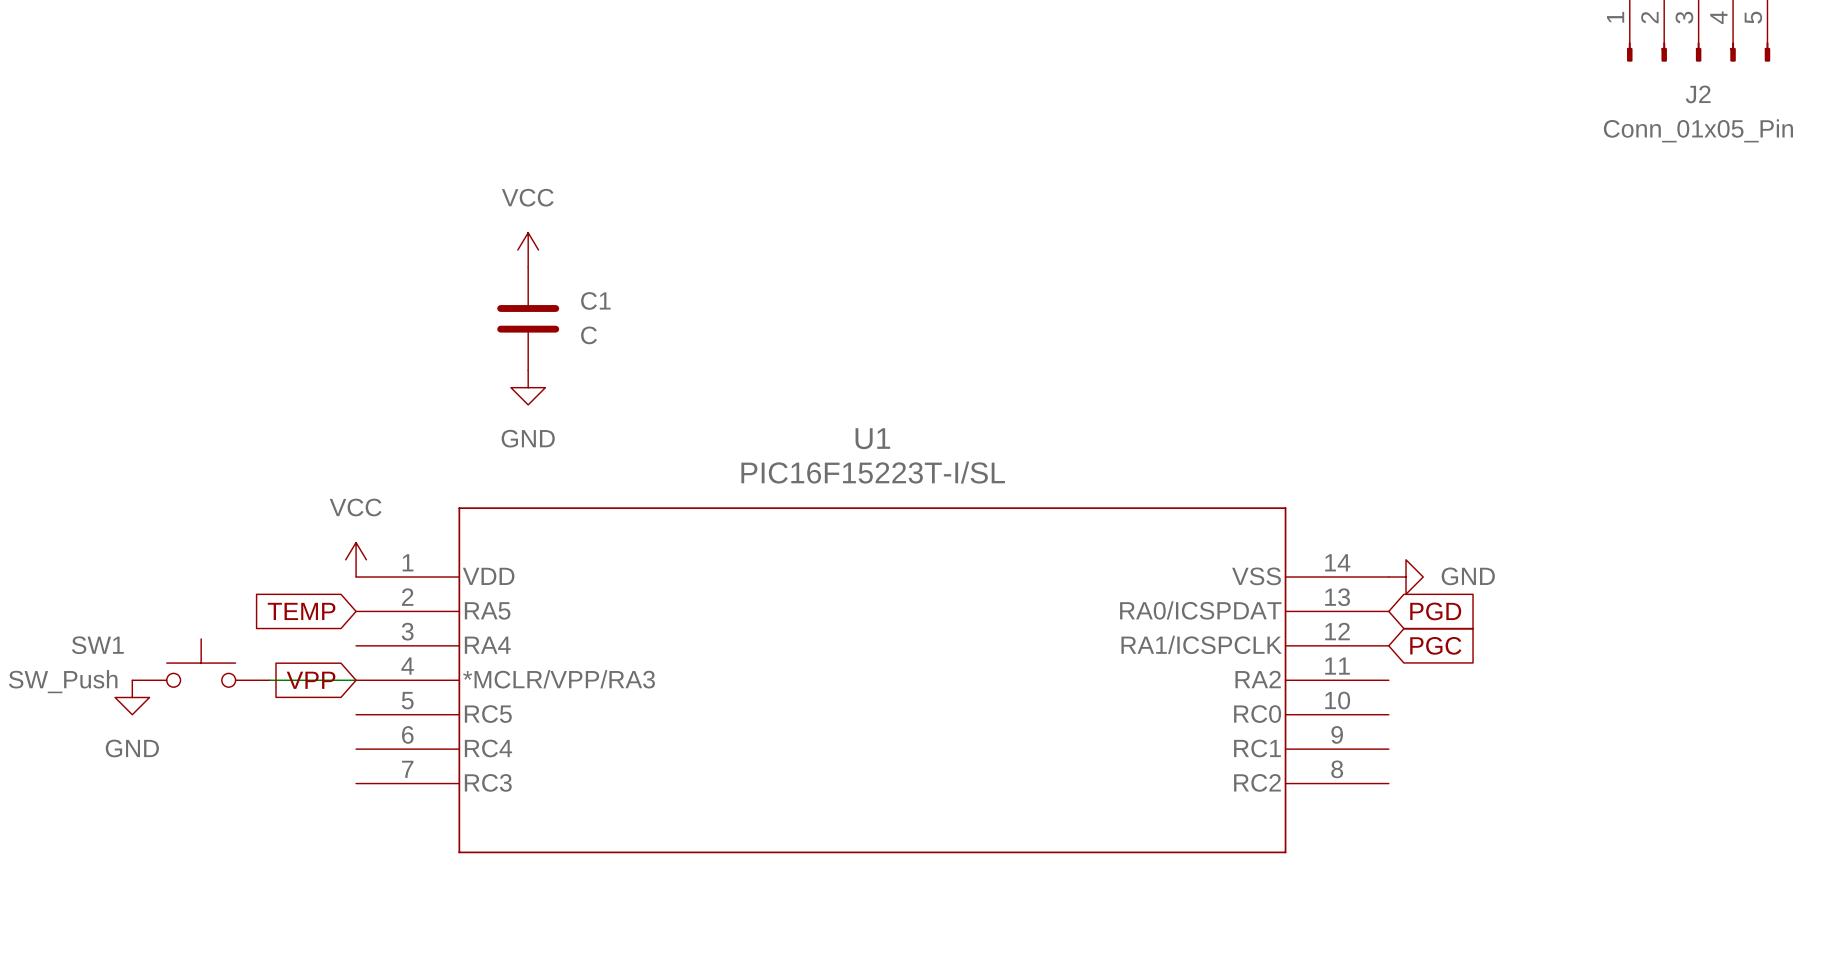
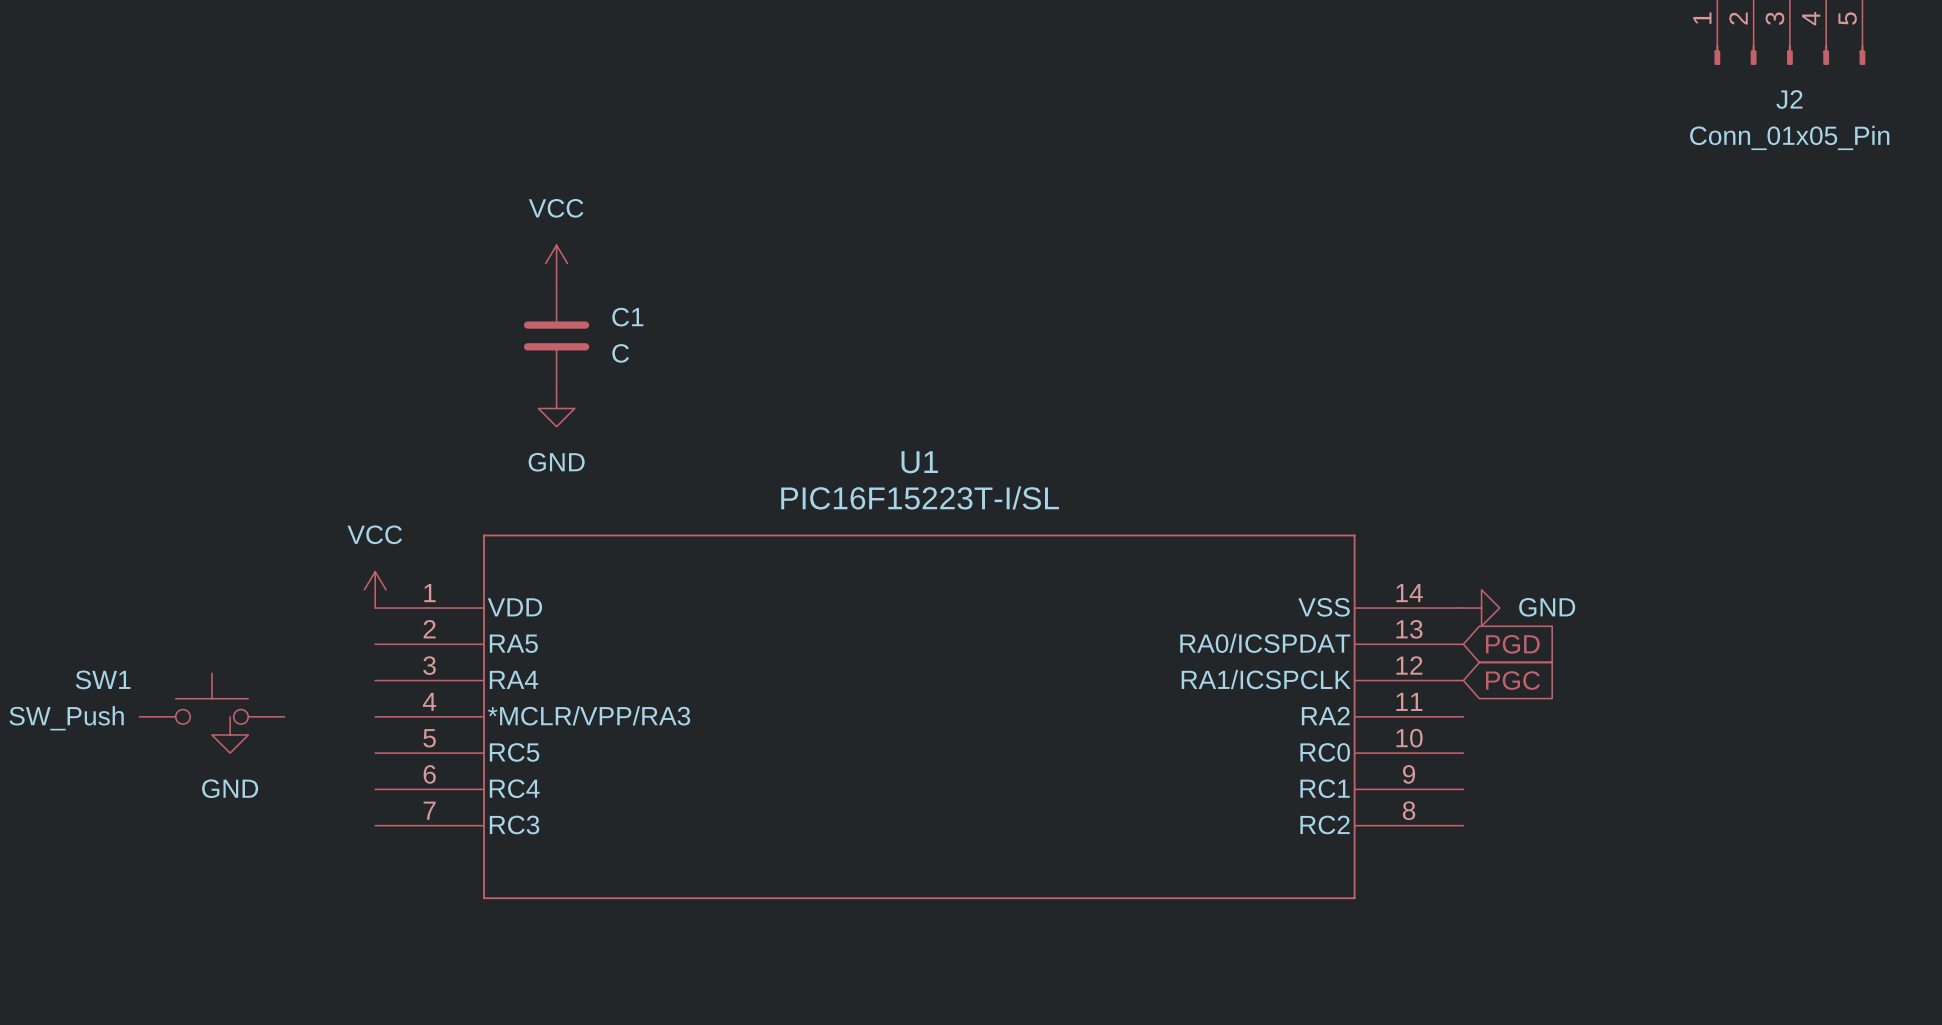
global label: TEMP (301, 611) -> none
wire: (270, 680) (356, 680) -> none
global label: VPP (311, 680) -> none
power symbol position: GND (132, 697) -> GND (230, 734)

